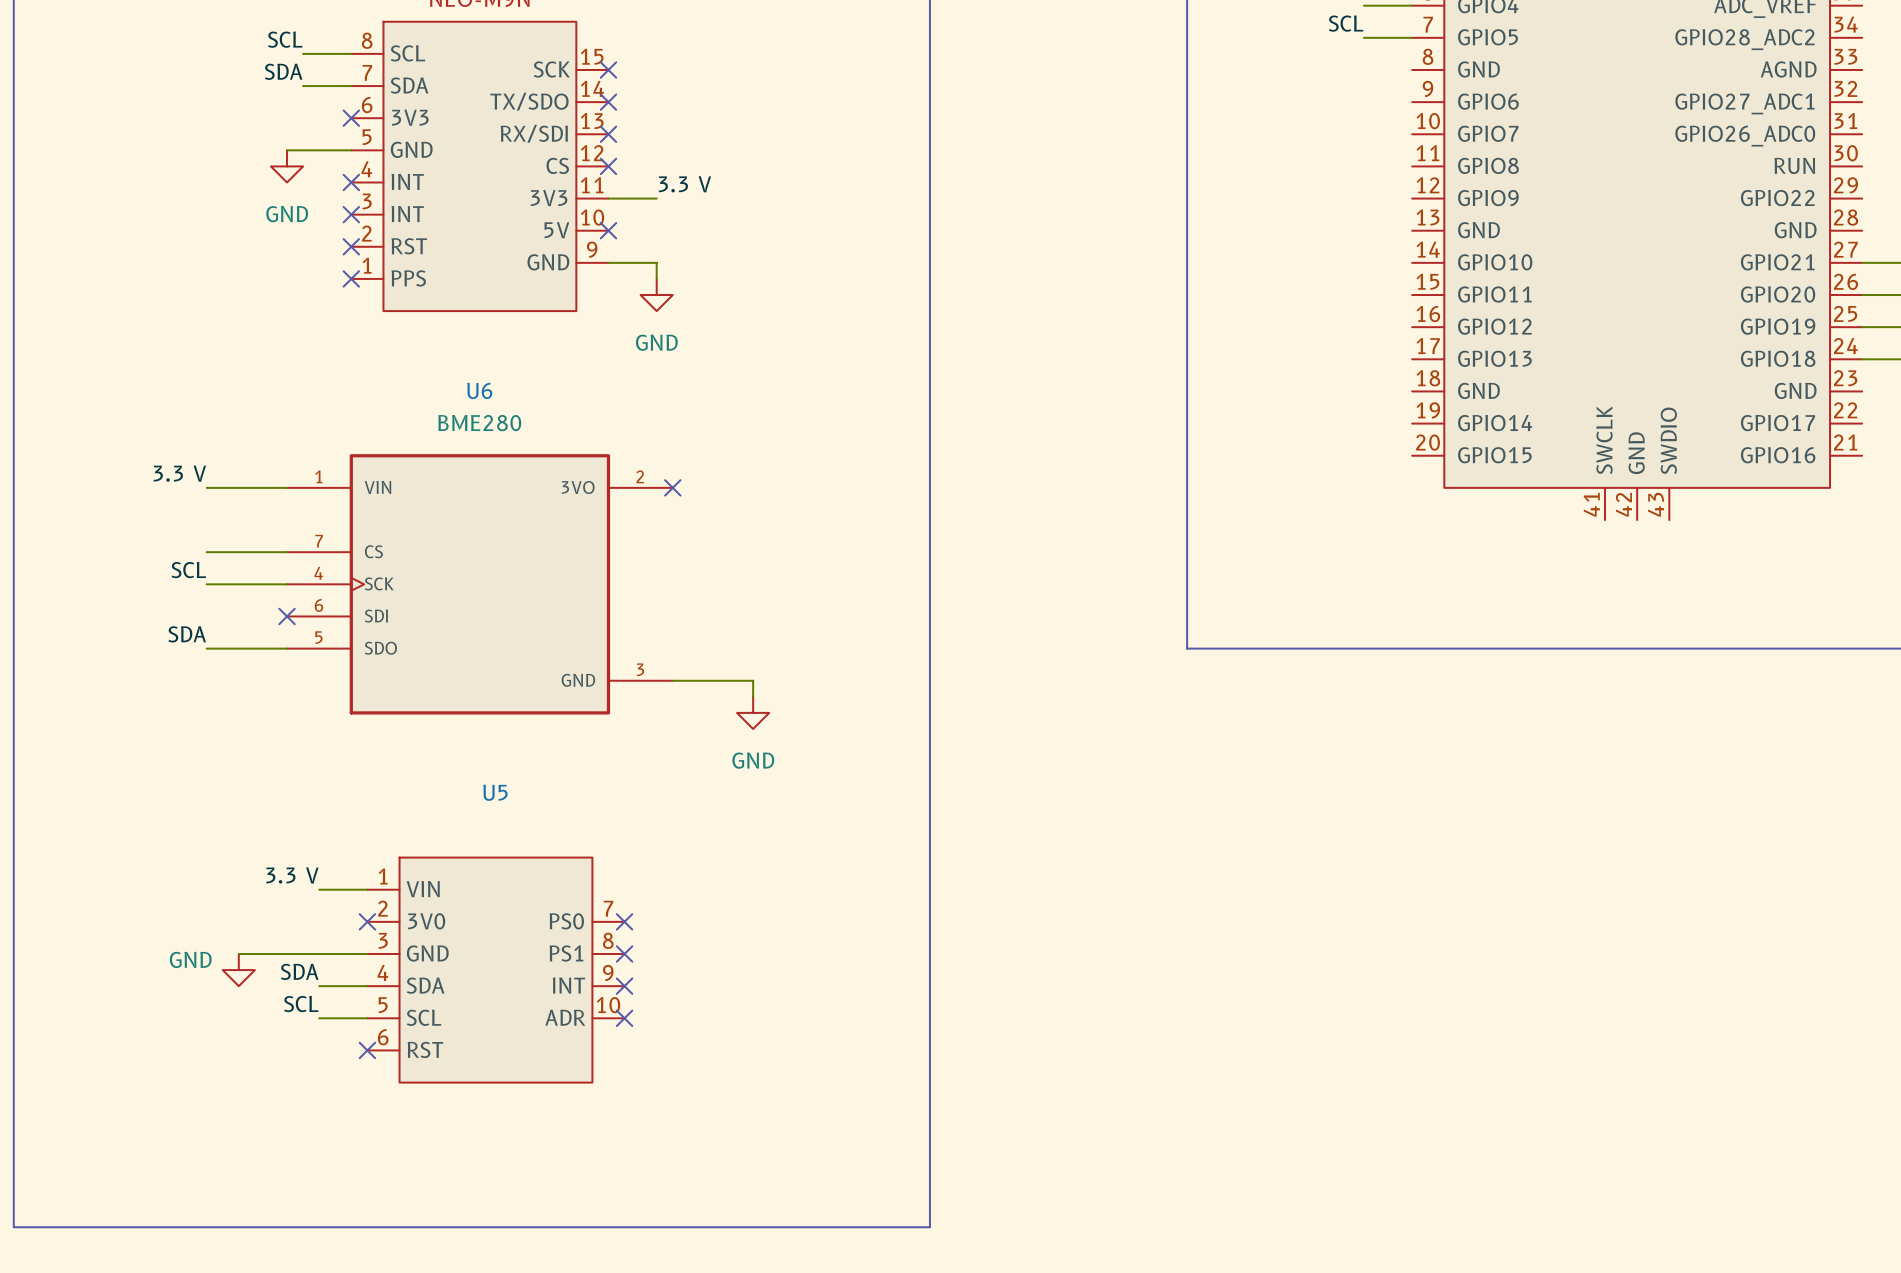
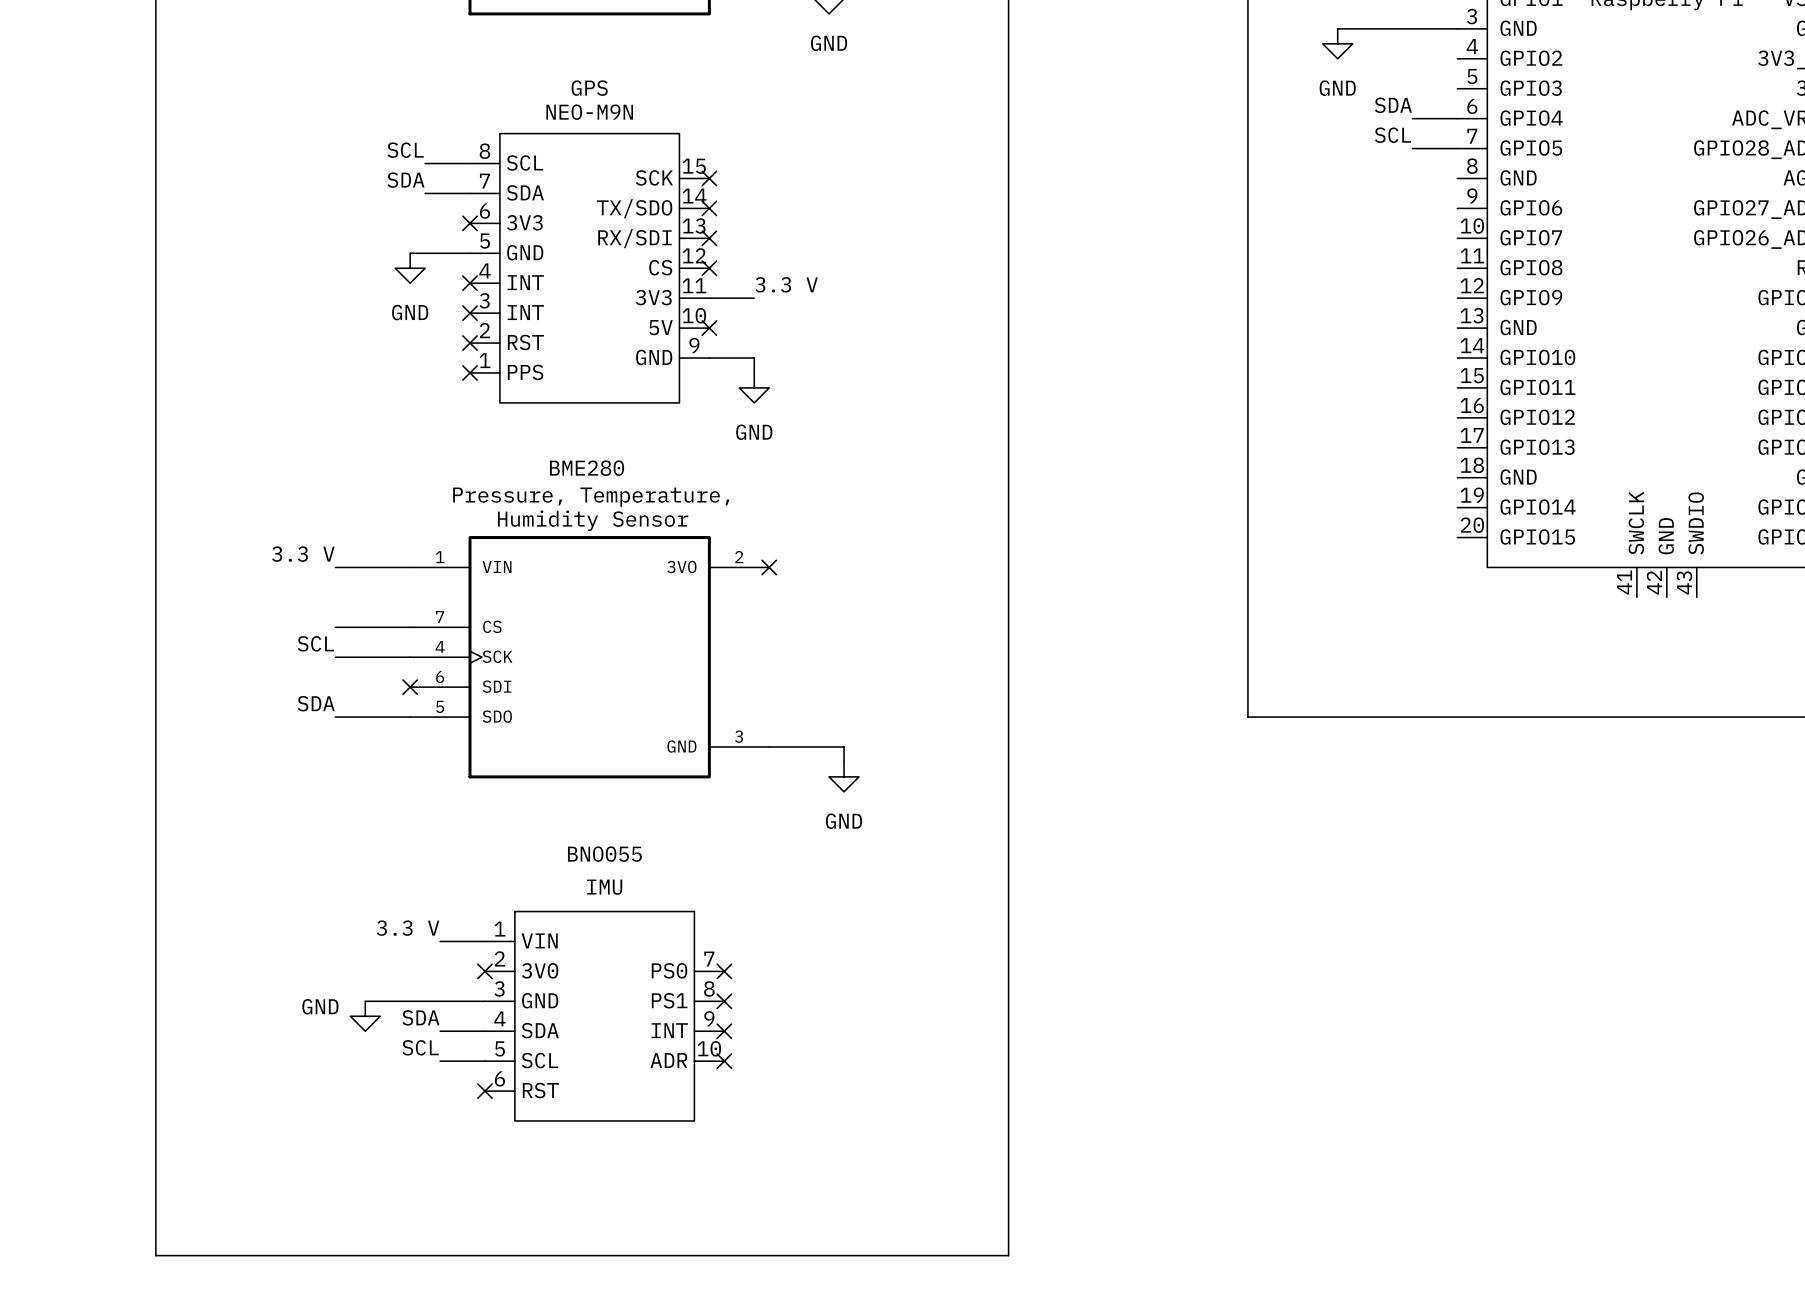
U6 name: U6 (479, 390) -> none
U6 text: none -> Pressure, Temperature, (591, 497)
U6 value position: BME280 (479, 423) -> BME280 (587, 468)
U6 text: none -> Humidity Sensor (593, 520)
U5 name: U5 (495, 792) -> none
U5 value: none -> BNO055 (604, 854)
U5 text: none -> IMU (604, 887)

